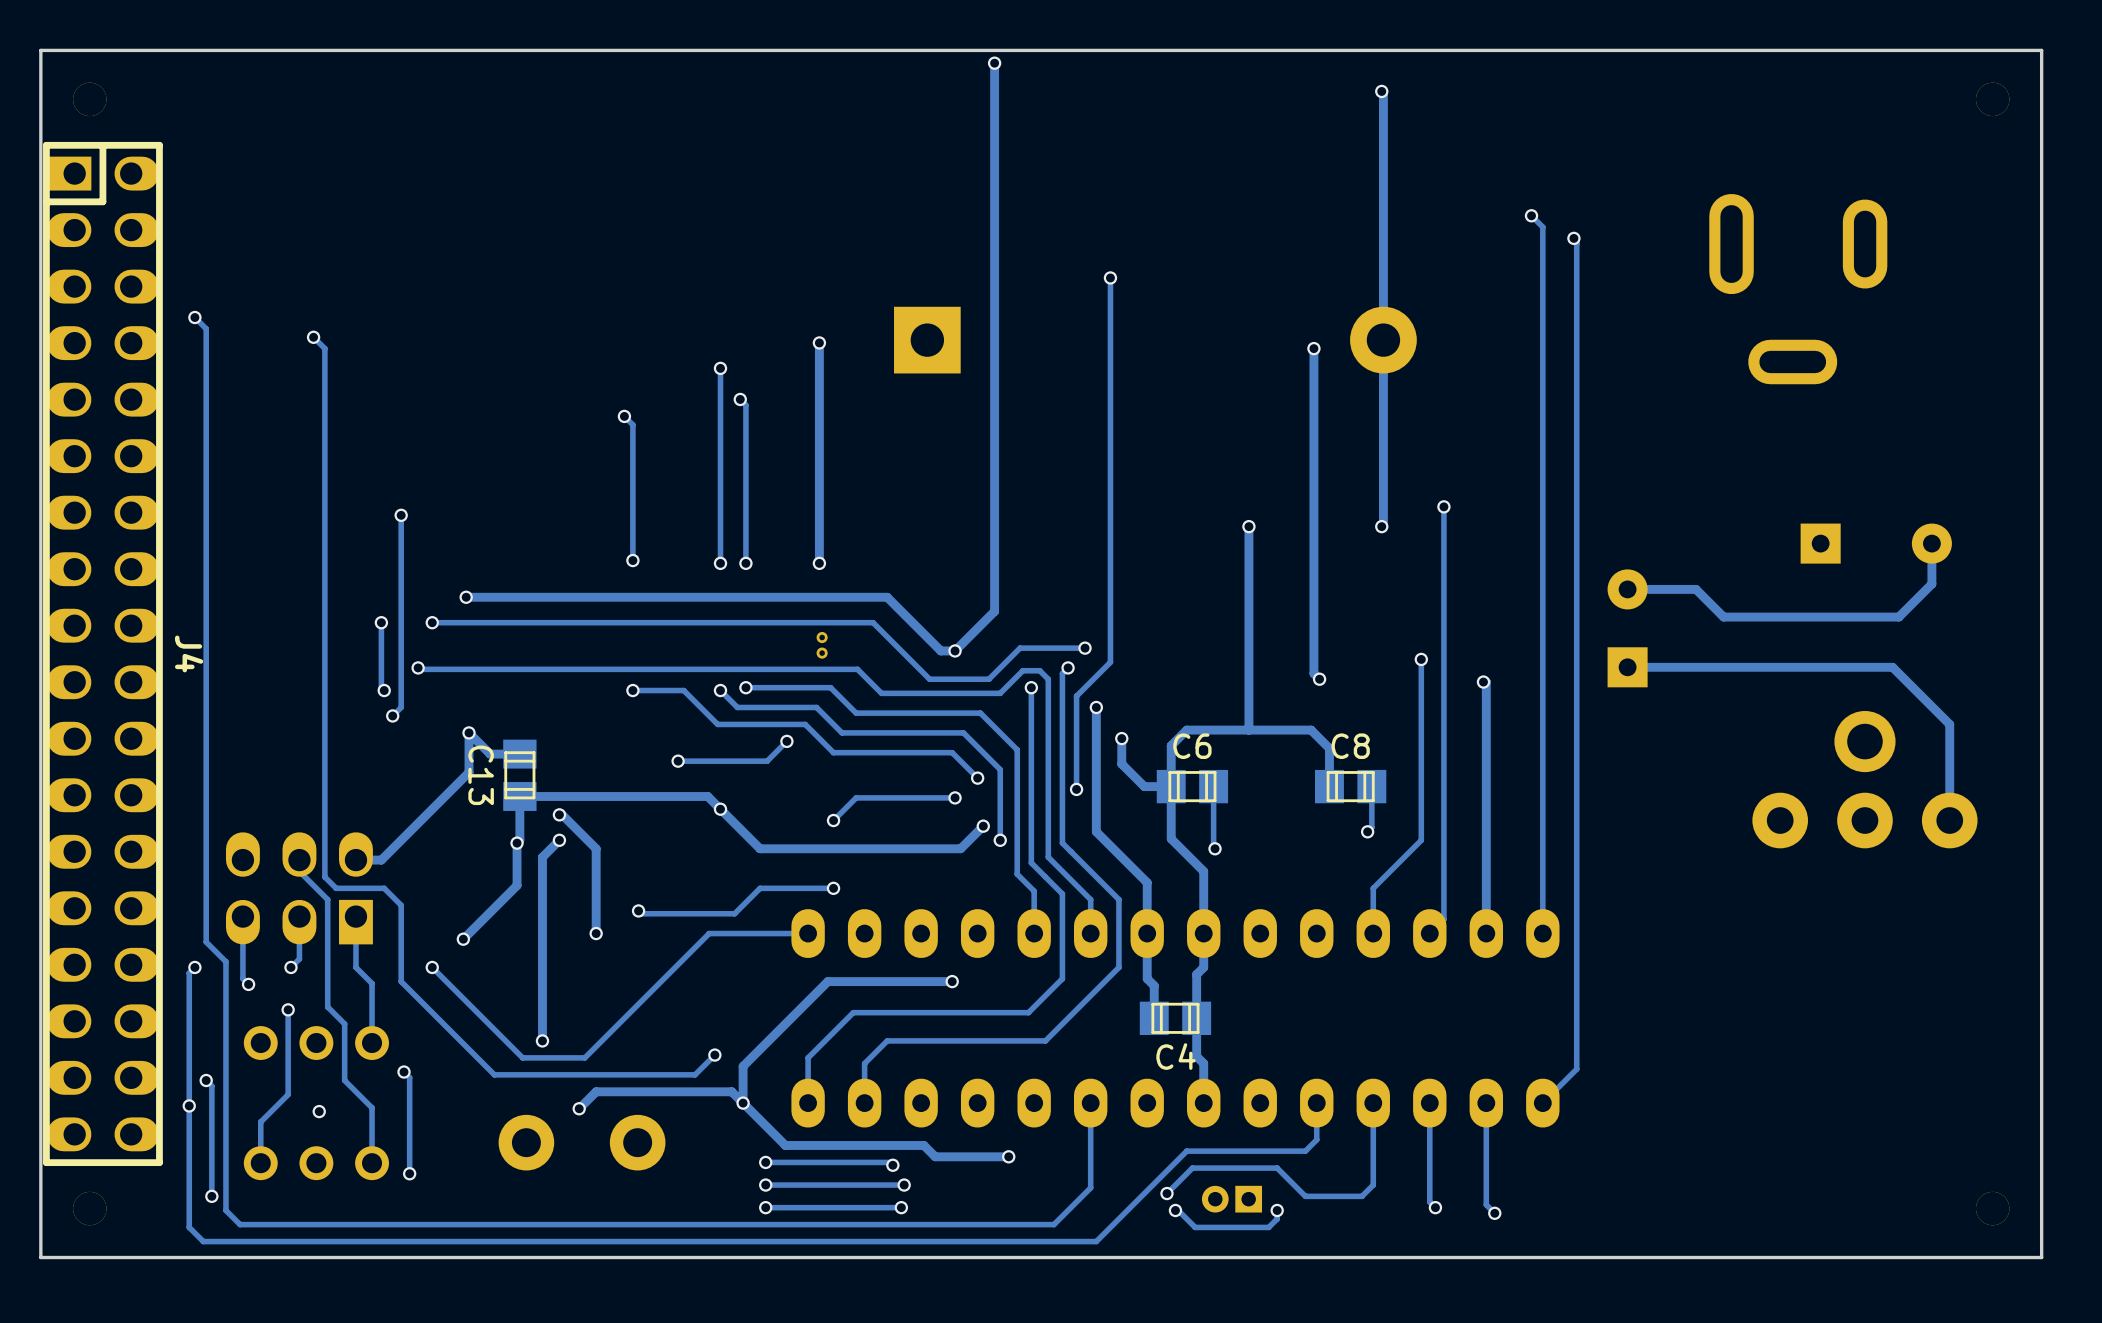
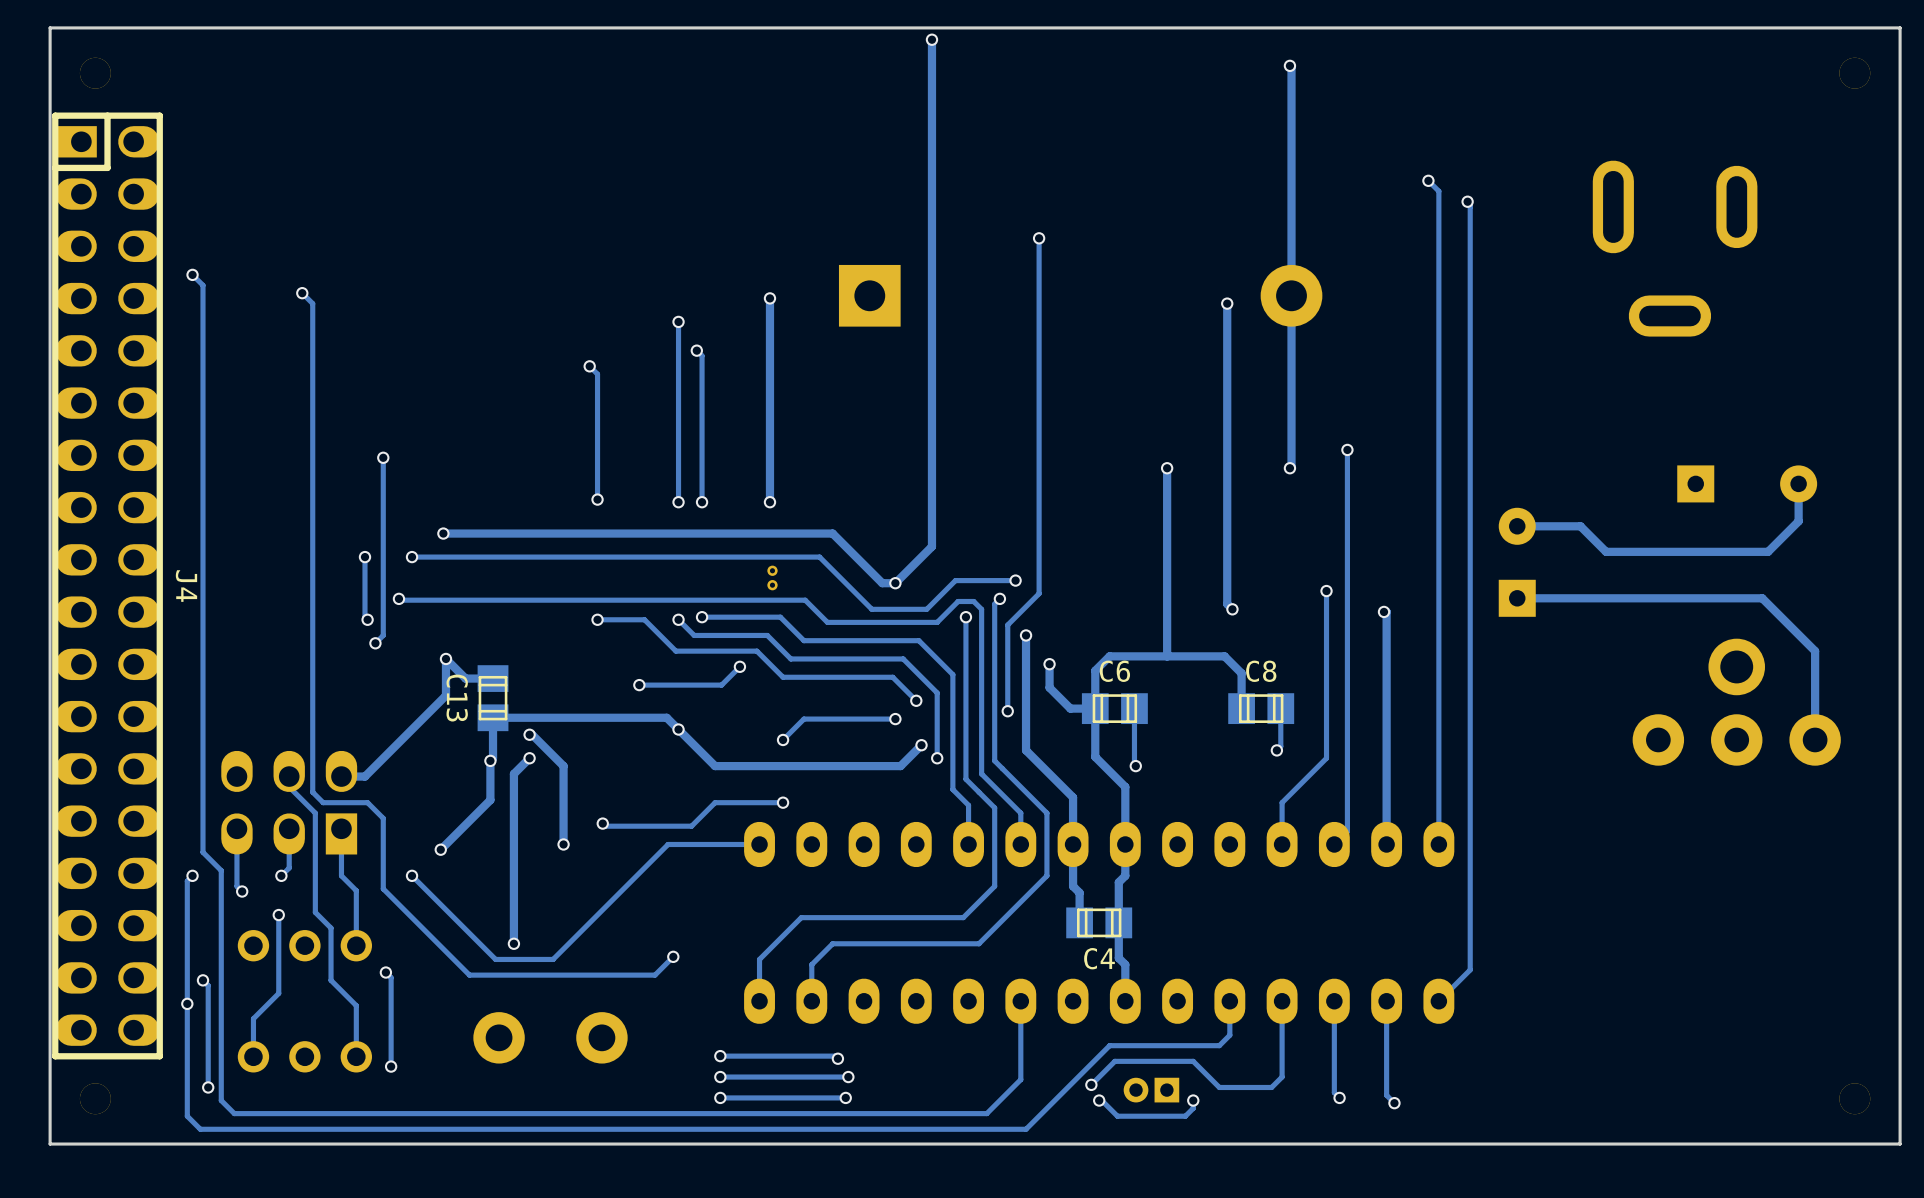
track: (952, 981) (827, 981) (743, 1066) (743, 1103) -> none
via: (952, 981) -> none
via: (743, 1103) -> none
track: (579, 1108) (596, 1091) (731, 1091) (785, 1145) (923, 1145) (935, 1156) (1008, 1156) -> none
via: (579, 1108) -> none
via: (319, 1111) -> none
via: (1008, 1156) -> none

